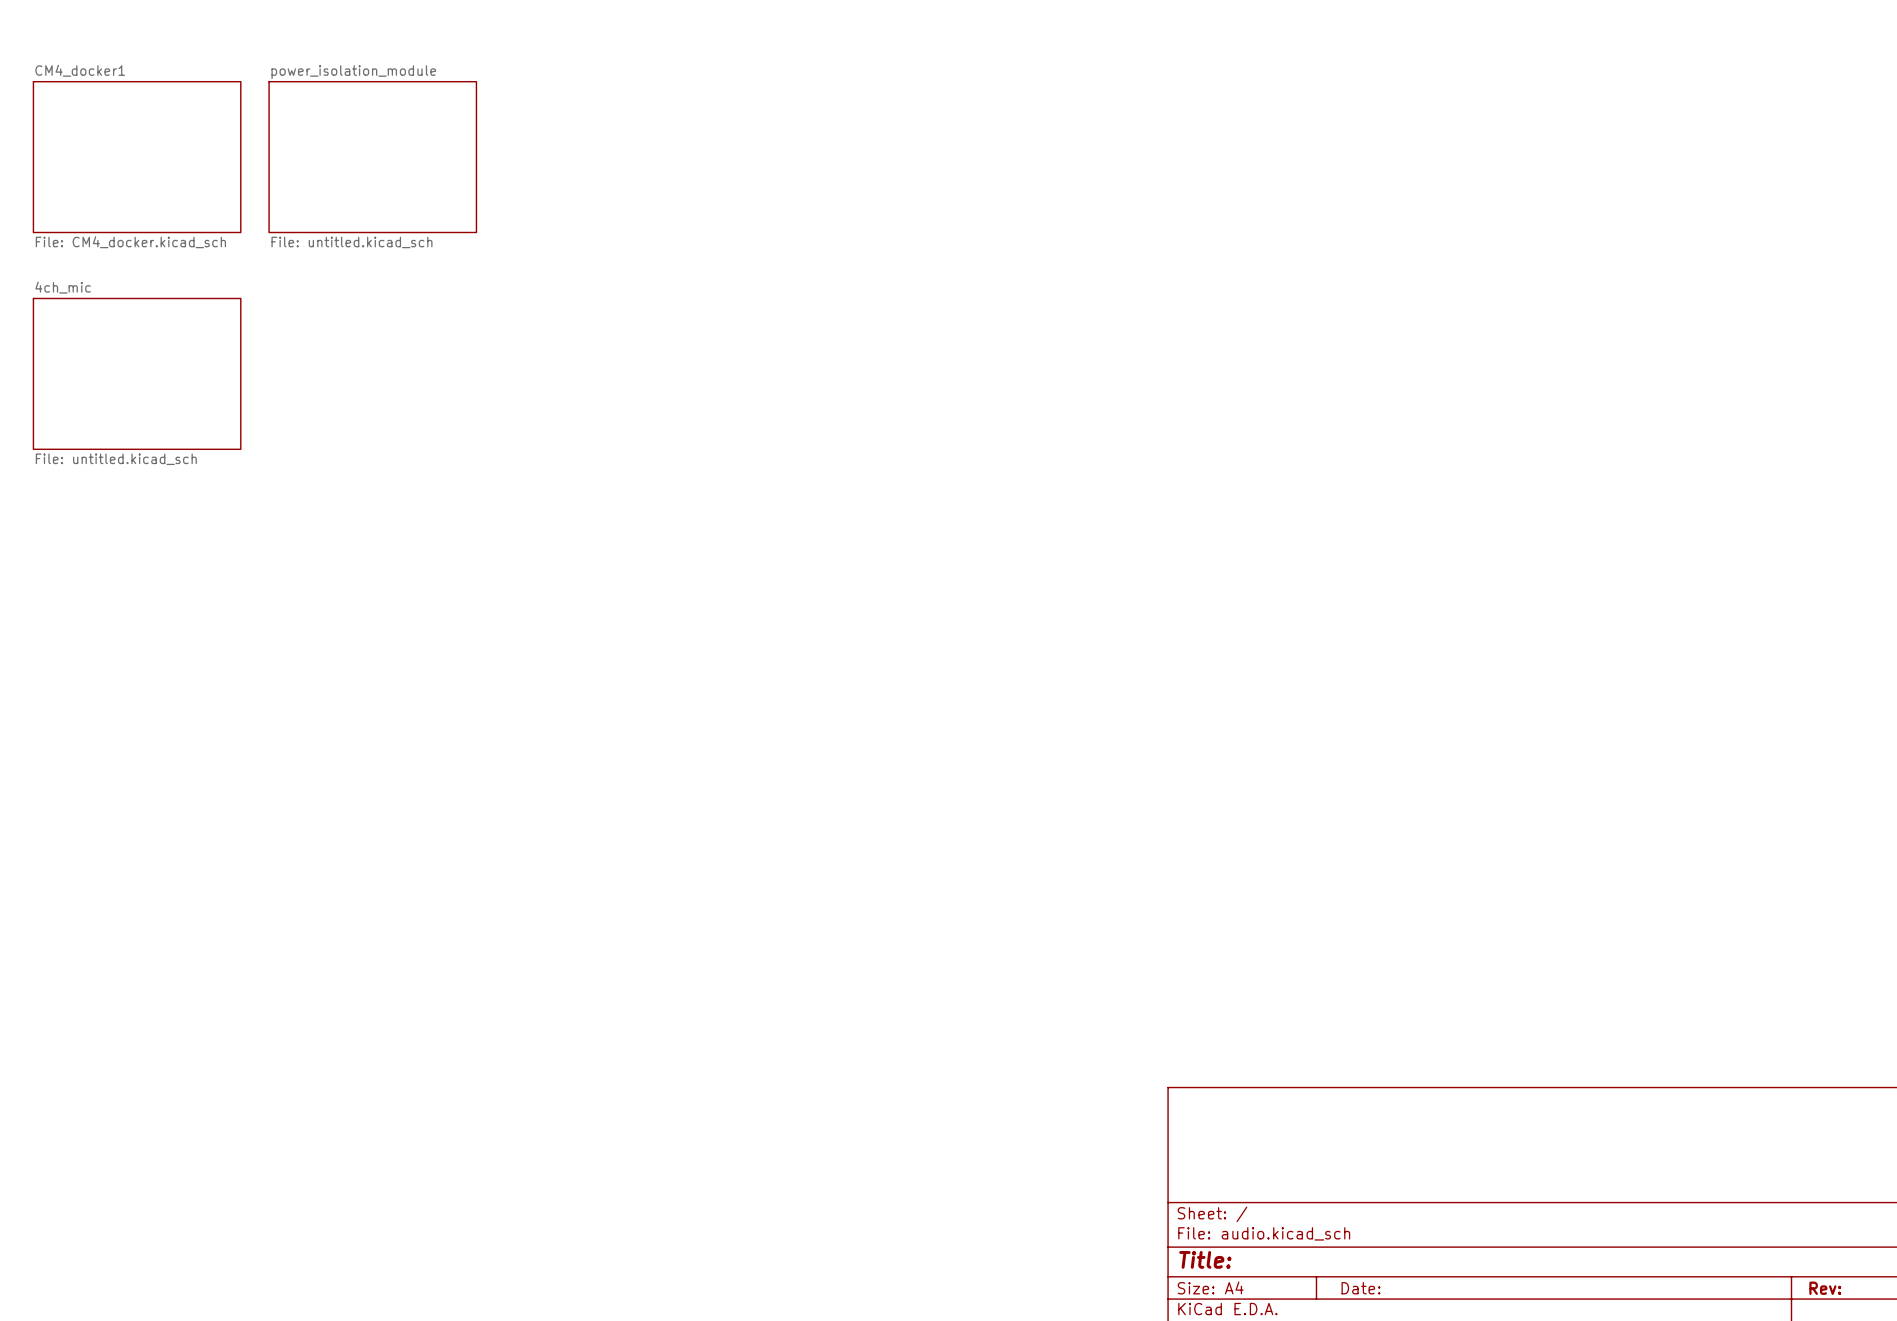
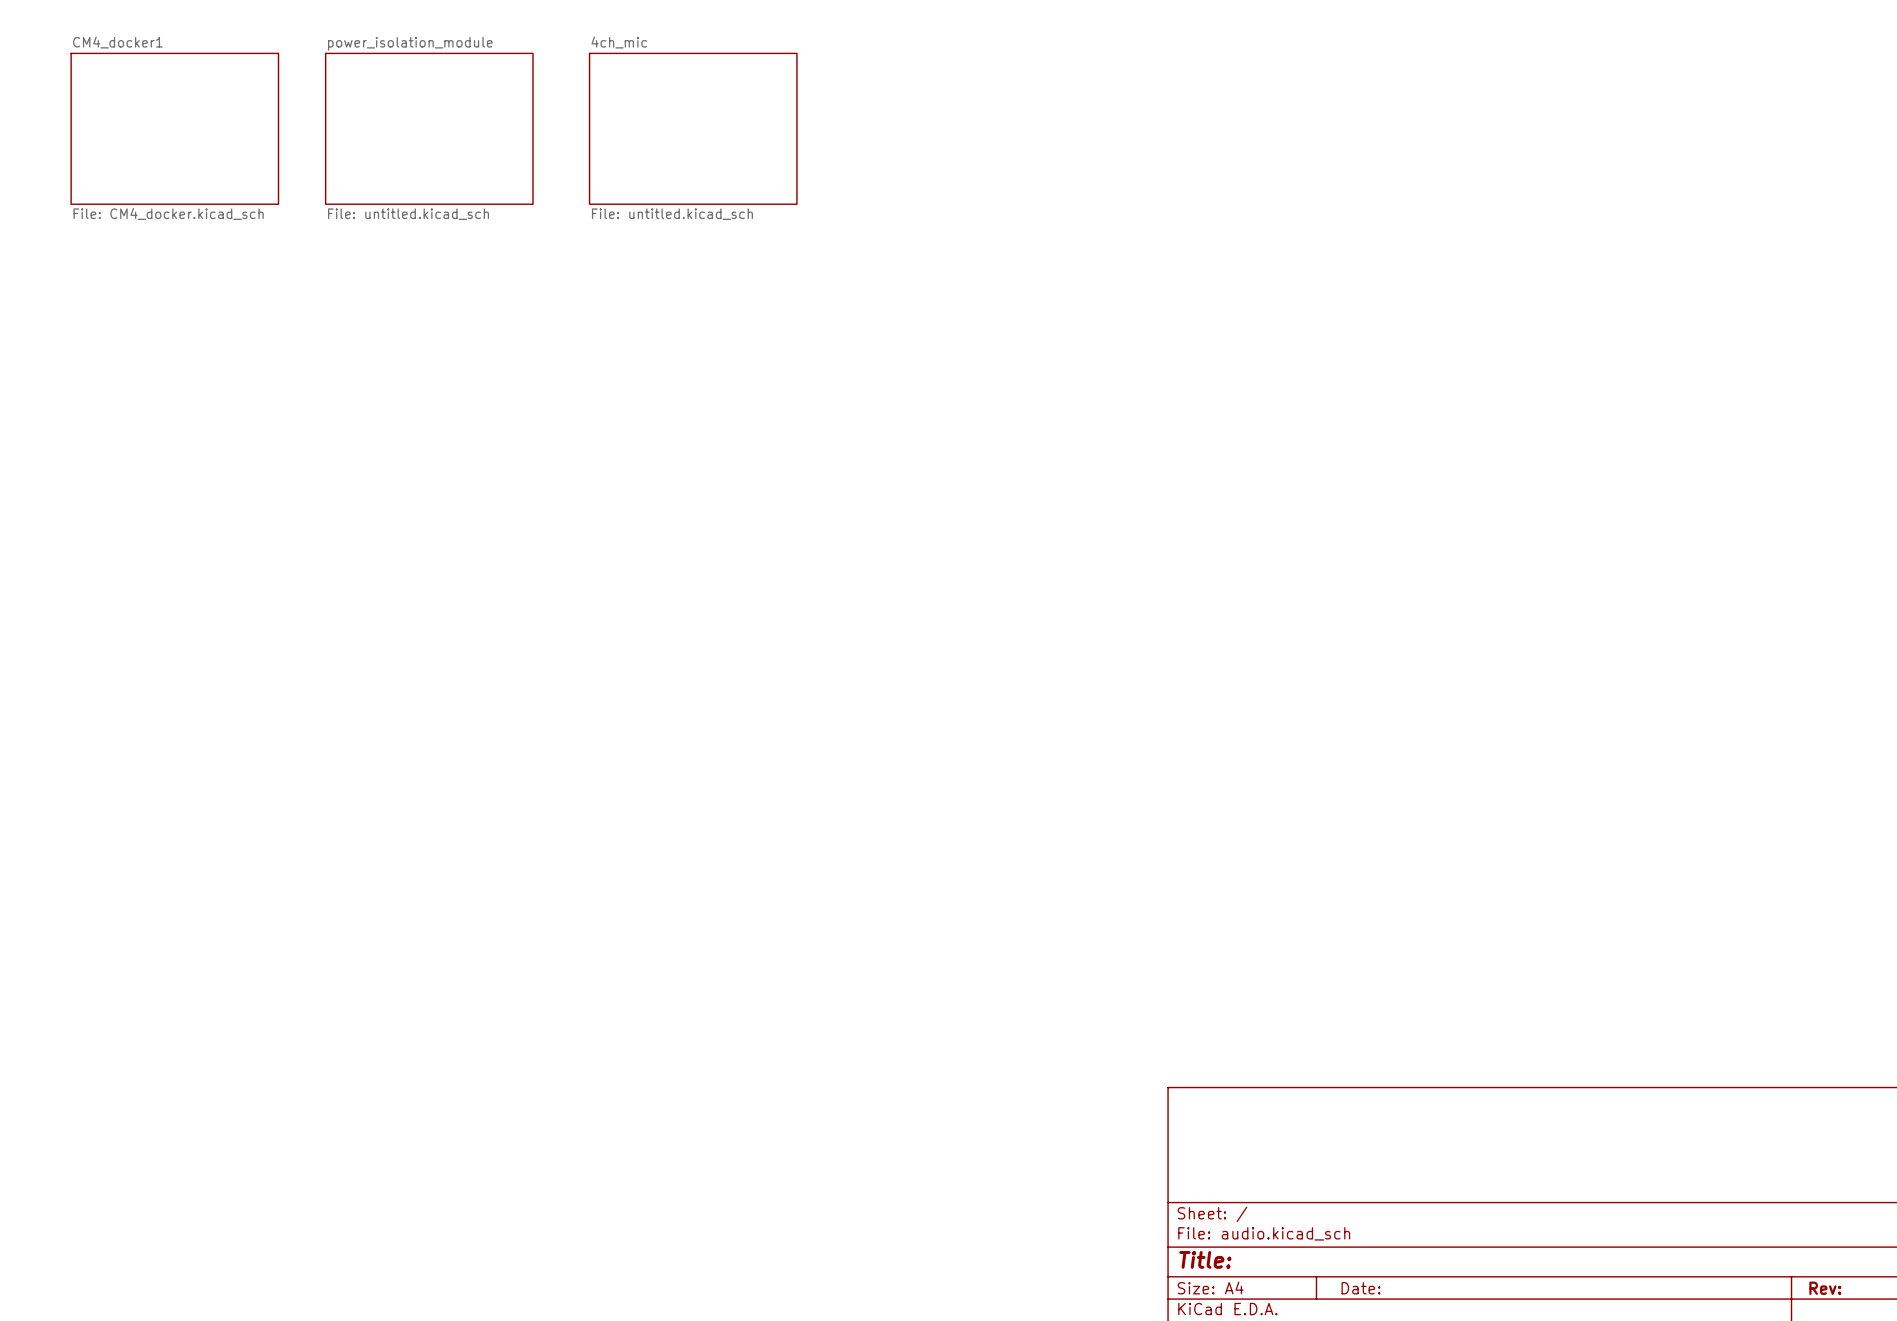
sheet CM4_docker1 position: (137, 157) -> (174, 128)
sheet power_isolation_module position: (372, 157) -> (429, 128)
sheet 4ch_mic position: (137, 373) -> (693, 128)

